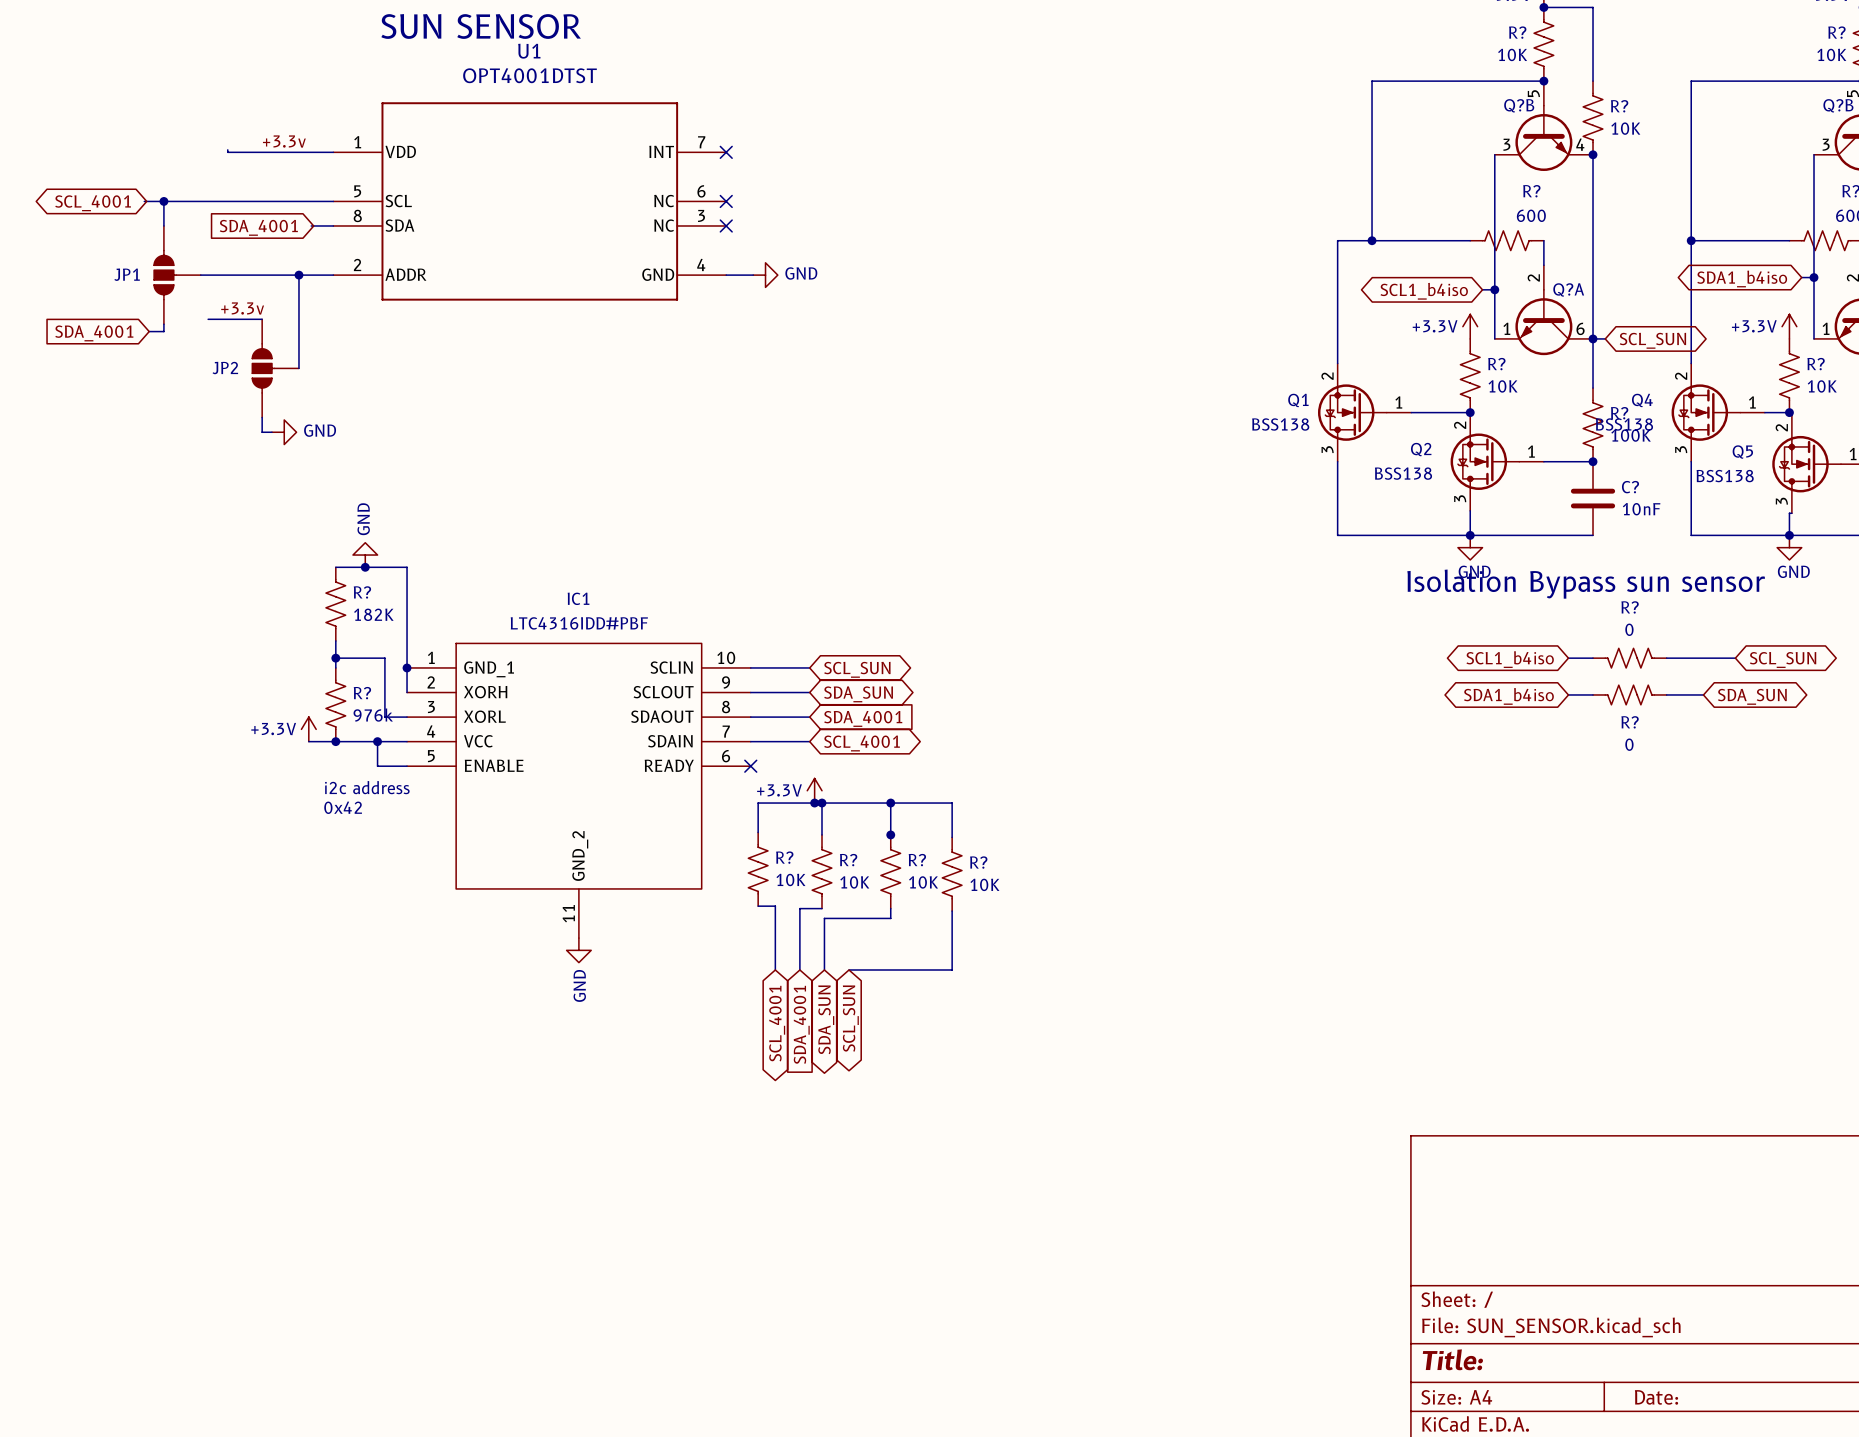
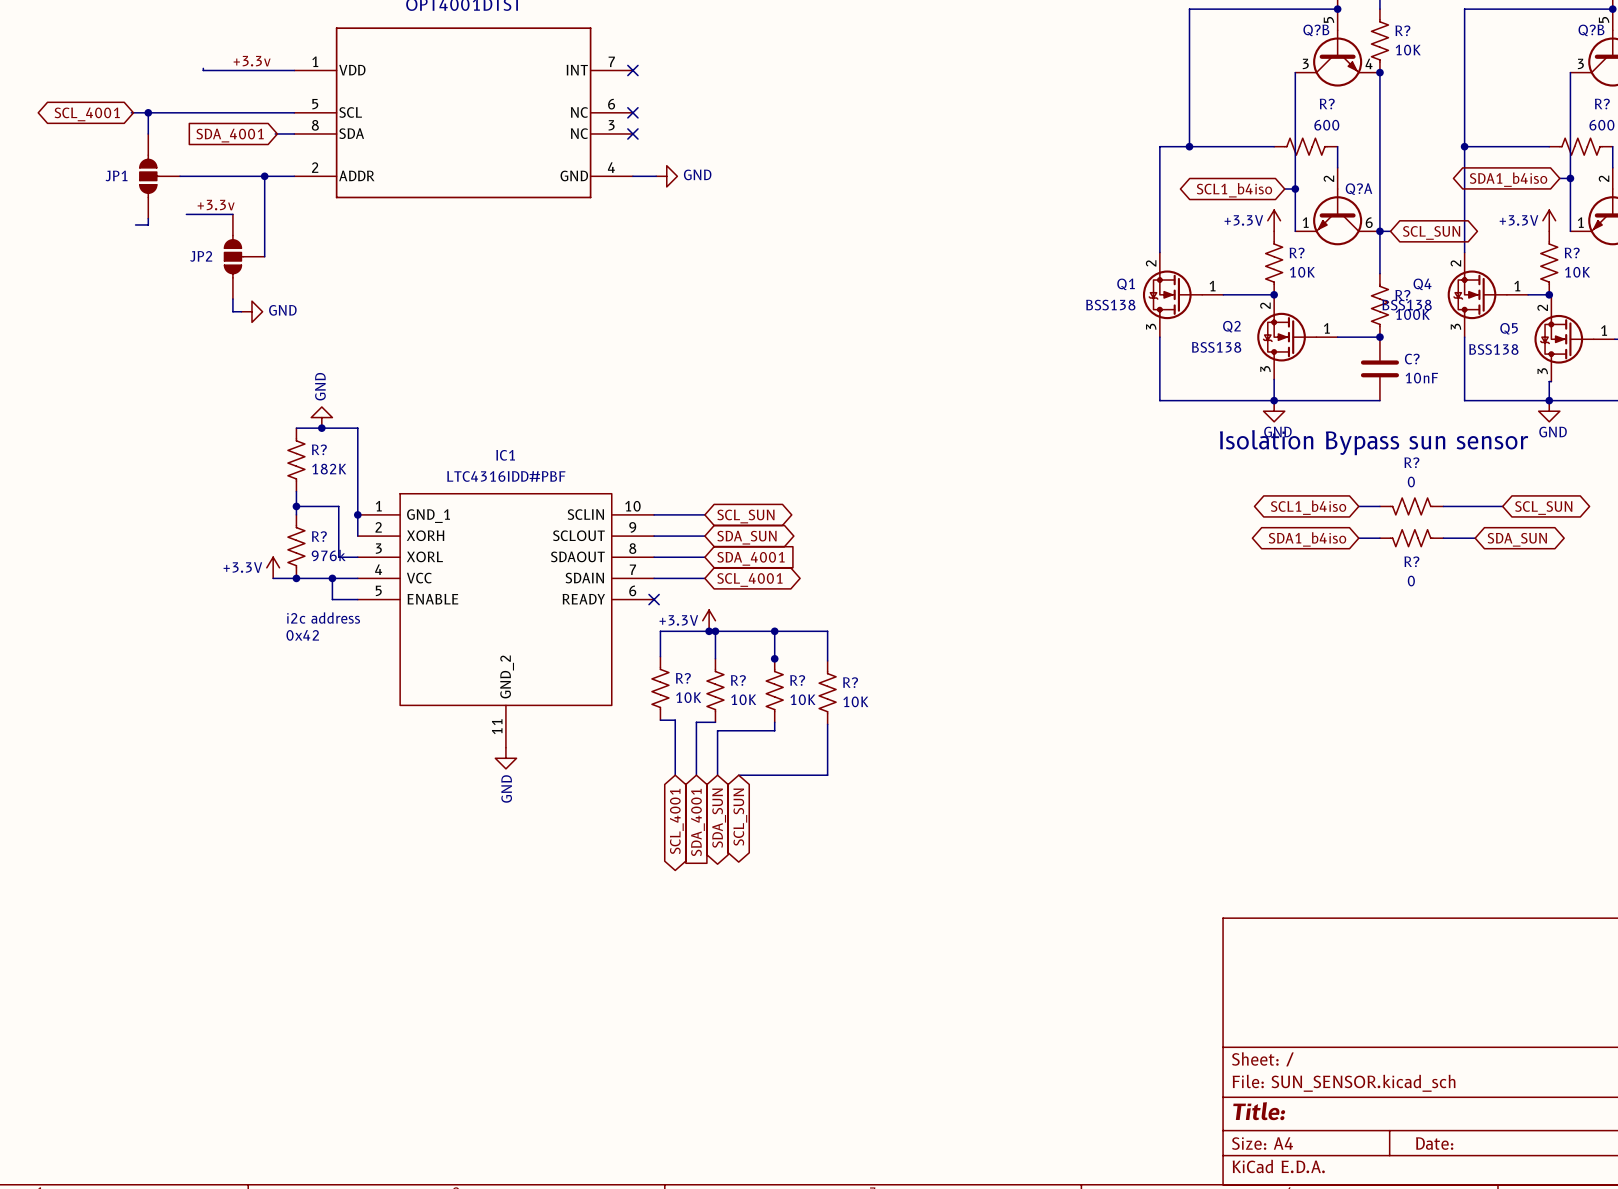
global label: SDA_4001 (94, 333) -> none

